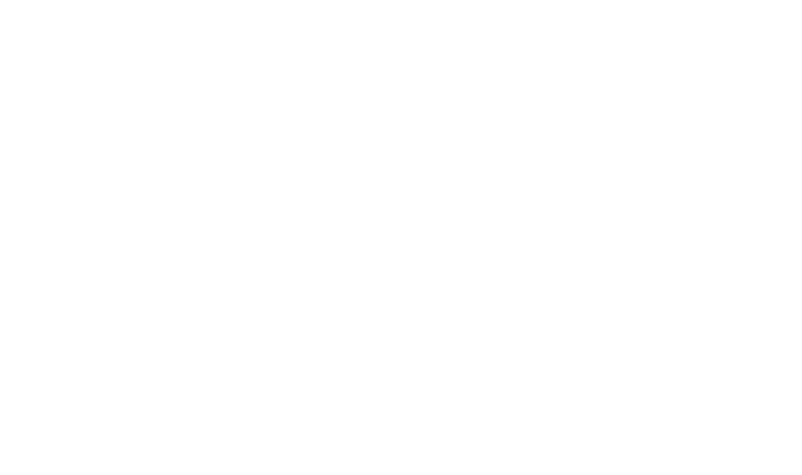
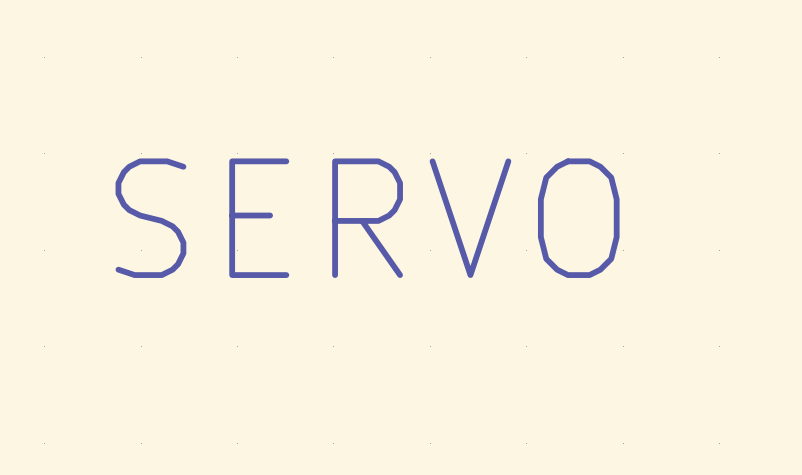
text: none -> SERVO (367, 218)

